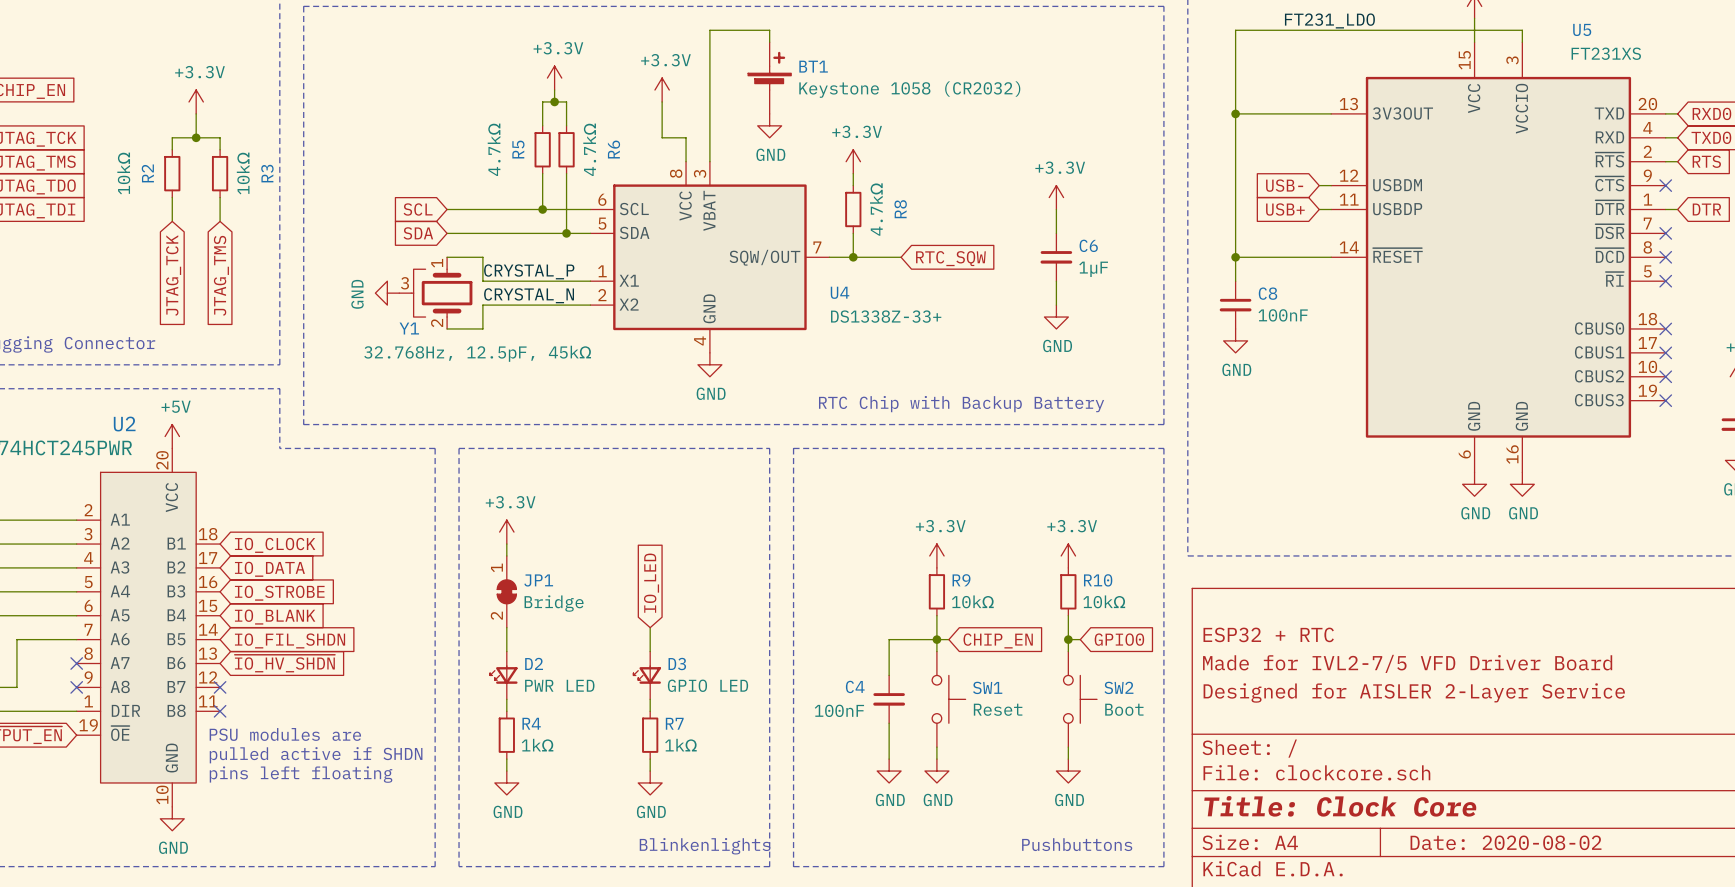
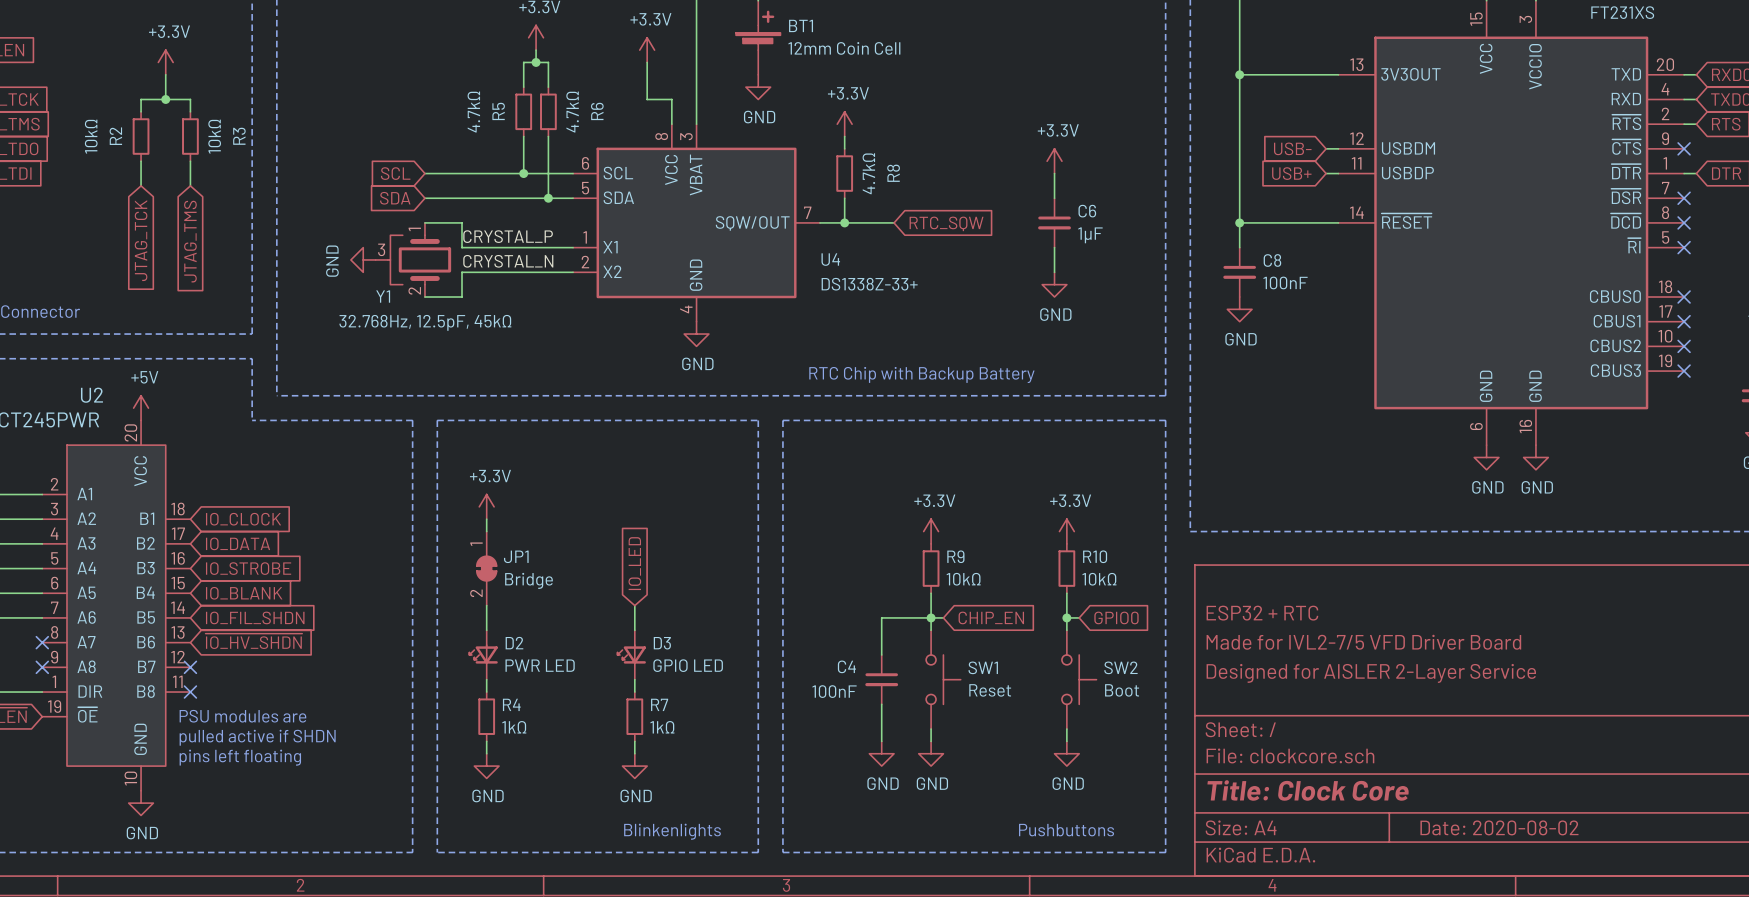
BT1 value: Keystone 1058 (CR2032) (909, 89) -> 12mm Coin Cell (844, 48)

